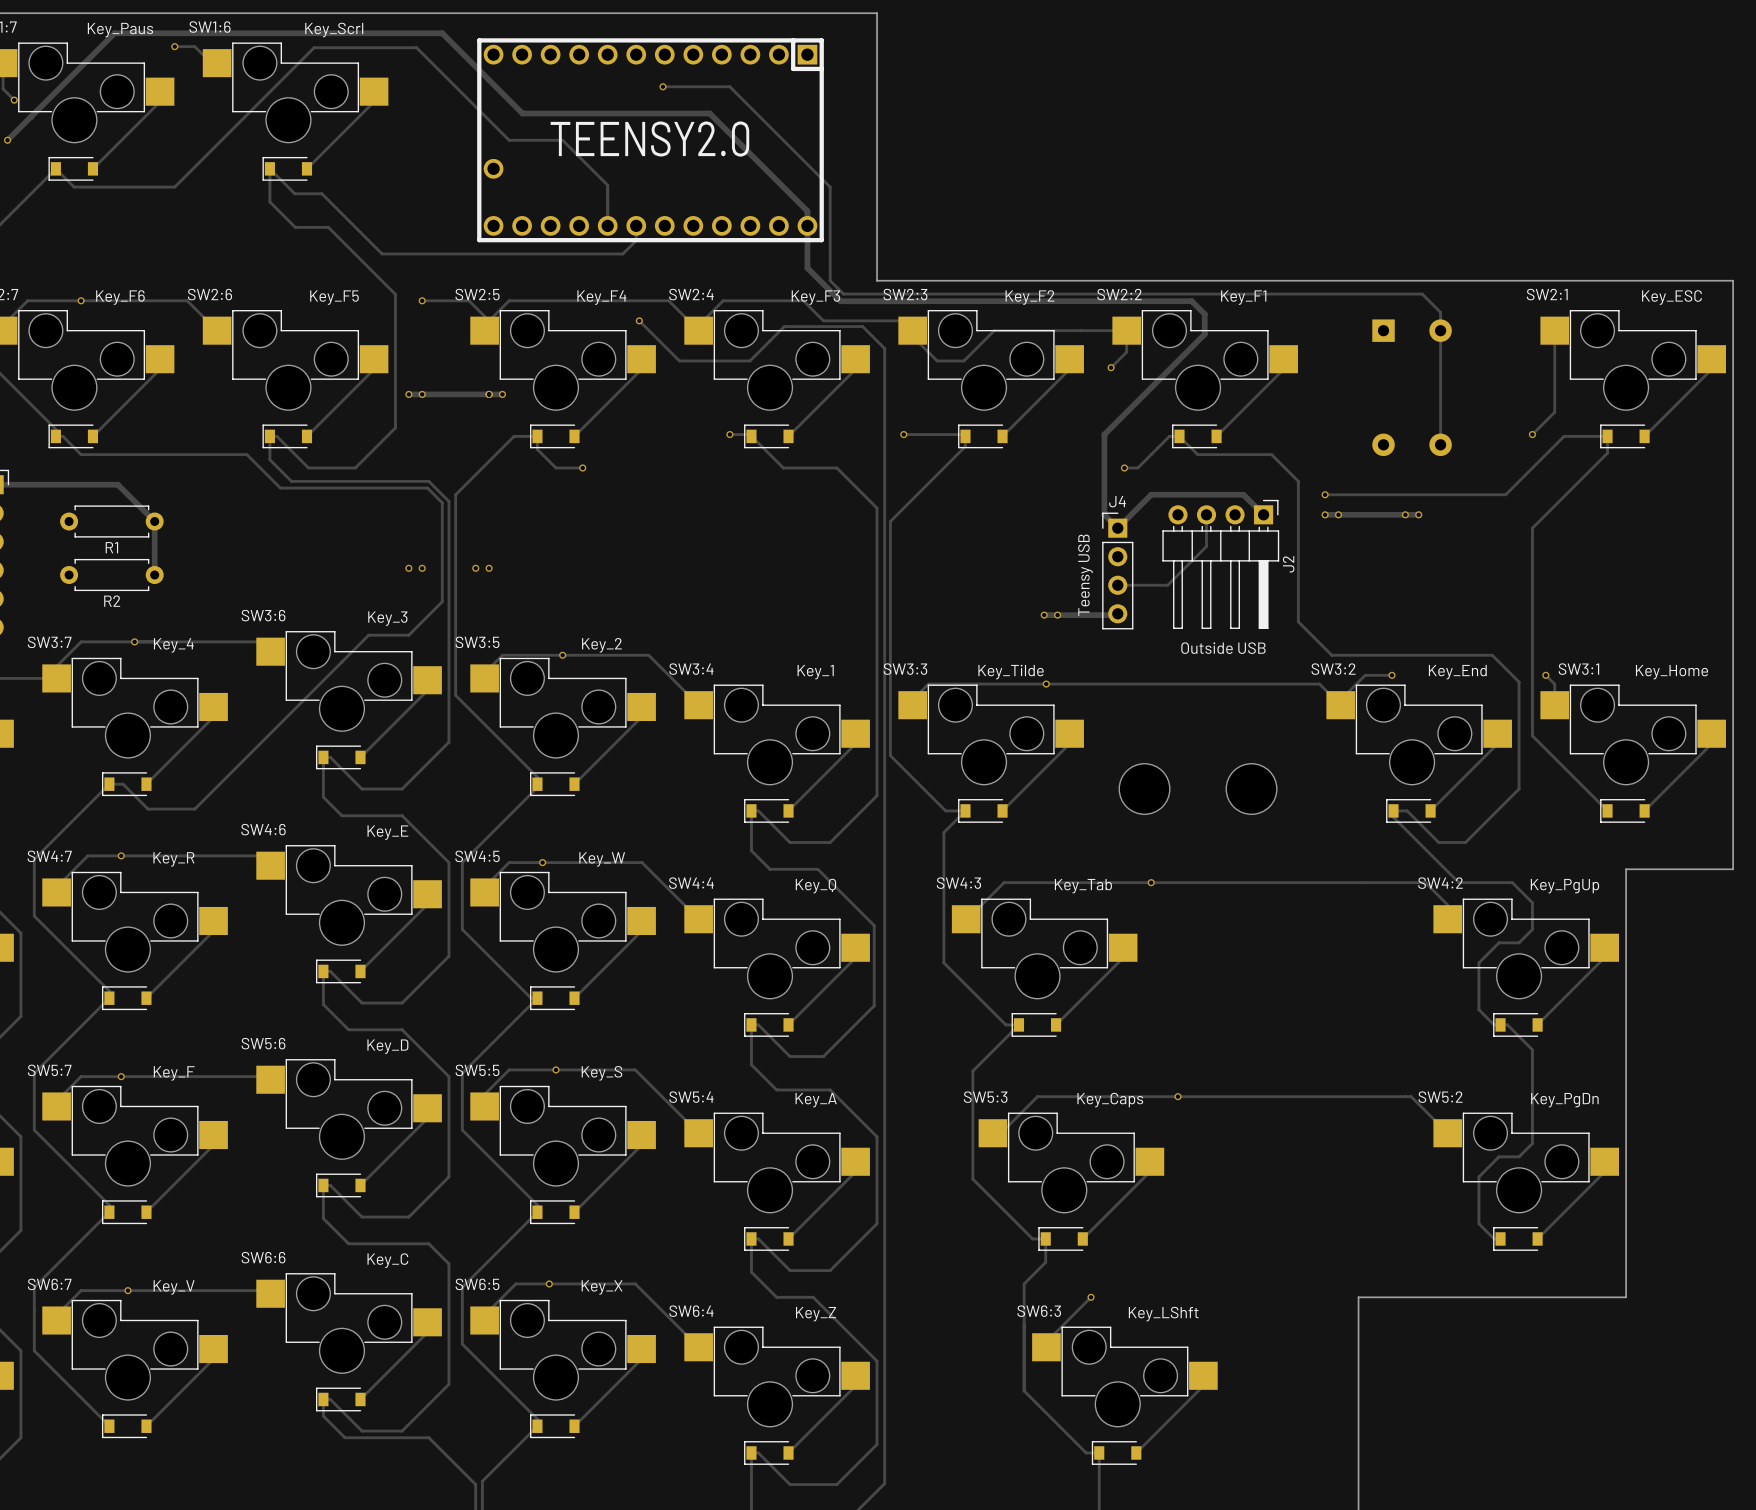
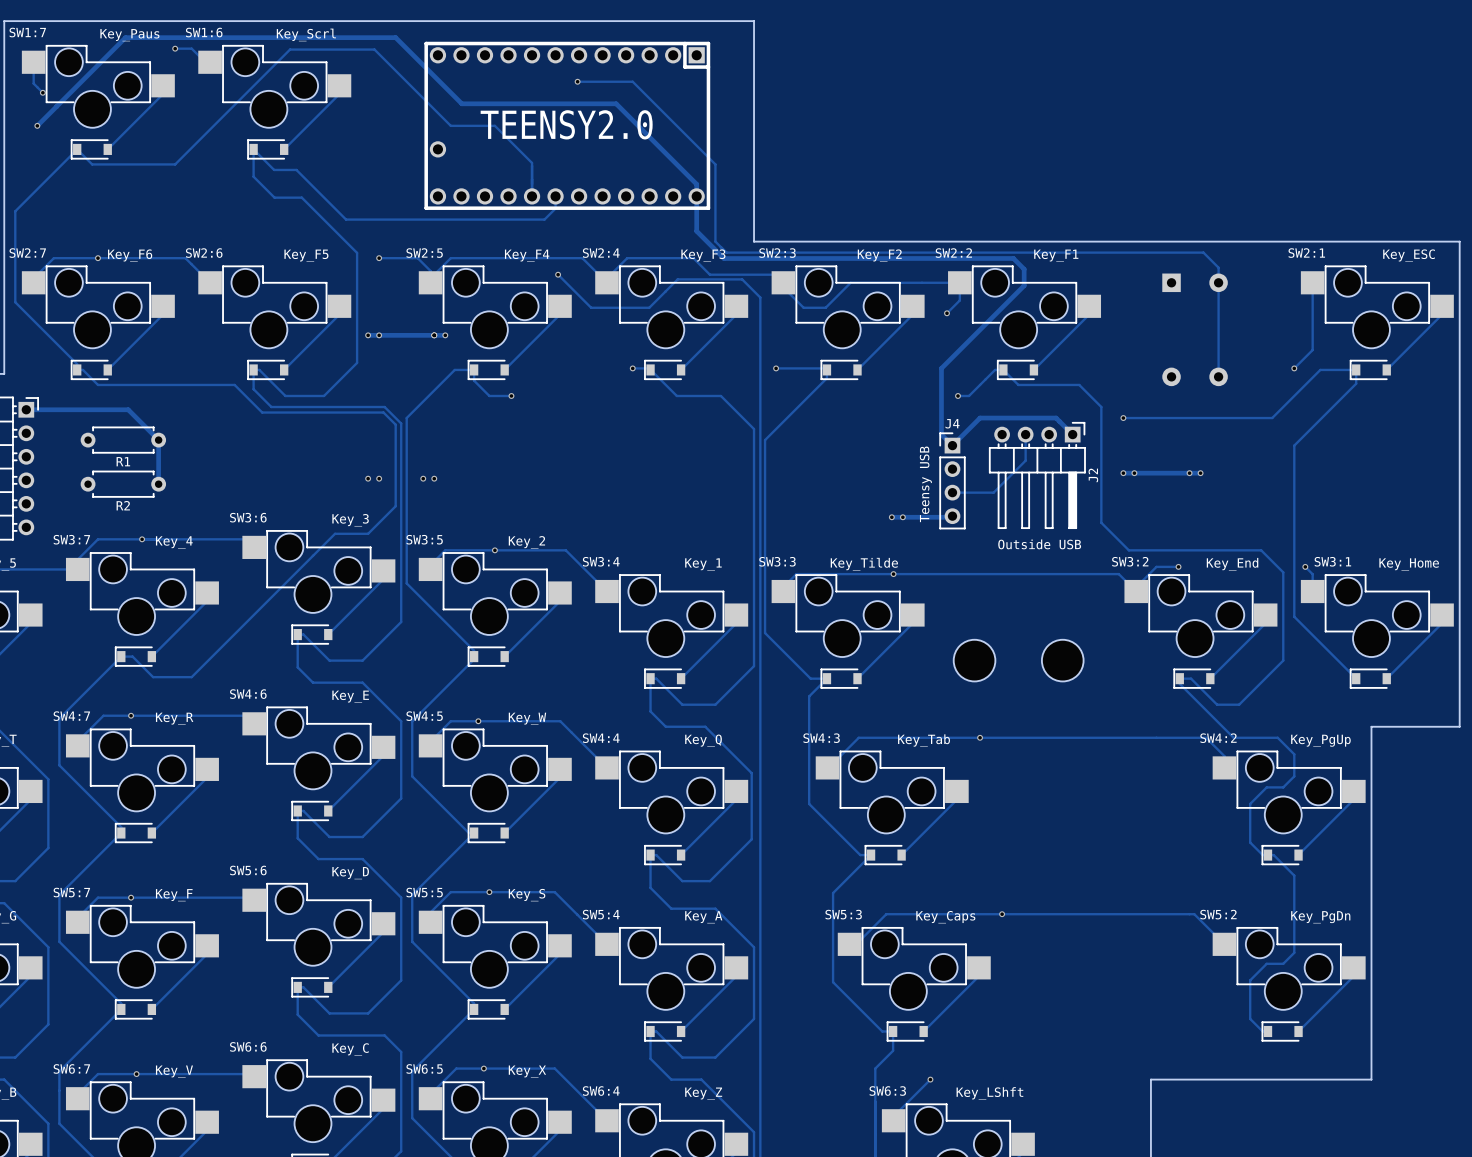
track: (1325, 514) (1418, 514) -> (1123, 473) (1200, 473)
via: (1325, 514) -> none
via: (1338, 514) -> none
via: (1405, 514) -> none
via: (1418, 514) -> none
via: none -> (1123, 473)
via: none -> (1134, 473)
via: none -> (1189, 473)
via: none -> (1200, 473)

